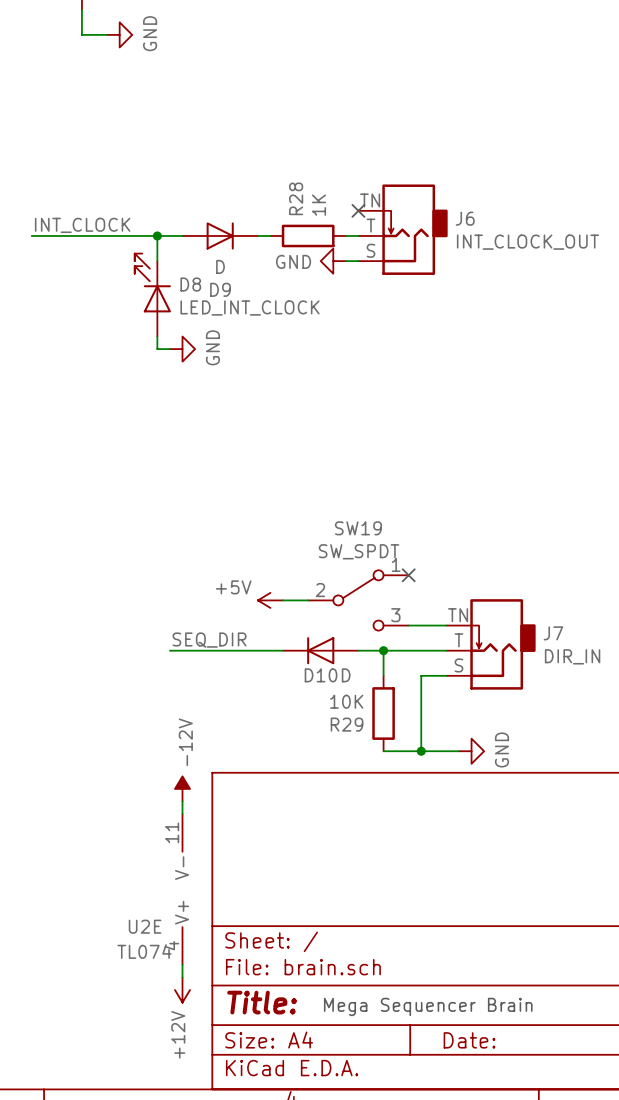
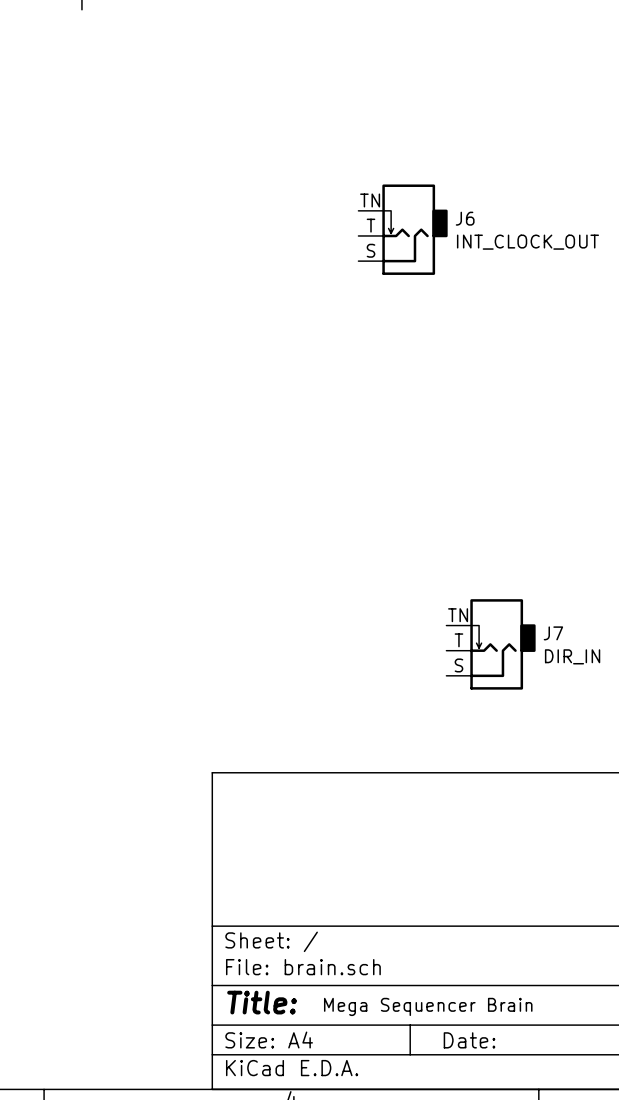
wire: (81, 9) (81, 34) (107, 34) -> none
power symbol: GND (119, 34) -> none
no-connect mark: (358, 210) -> none
label: INT_CLOCK (82, 225) -> none
wire: (31, 235) (182, 235) -> none
wire: (157, 235) (157, 261) -> none
junction: (157, 235) -> none
D9: D (220, 235) -> none
wire: (257, 235) (270, 235) -> none
R28: 1K (308, 235) -> none
wire: (345, 235) (358, 235) -> none
power symbol: GND (333, 261) -> none
wire: (345, 261) (358, 261) -> none
D8: LED_INT_CLOCK (152, 295) -> none
wire: (157, 336) (157, 349) (169, 349) -> none
power symbol: GND (182, 349) -> none
no-connect mark: (408, 575) -> none
power symbol: +5V (270, 600) -> none
wire: (283, 600) (308, 600) -> none
SW19: SW_SPDT (358, 600) -> none
wire: (408, 625) (446, 625) -> none
label: SEQ_DIR (209, 640) -> none
wire: (169, 650) (283, 650) -> none
D10: D (320, 650) -> none
wire: (358, 650) (446, 650) -> none
wire: (383, 650) (383, 675) -> none
junction: (383, 650) -> none
wire: (446, 675) (421, 675) (421, 751) -> none
R29: 10K (383, 713) -> none
wire: (383, 751) (458, 751) -> none
junction: (421, 751) -> none
power symbol: GND (471, 751) -> none
power symbol: -12V (182, 788) -> none
wire: (182, 801) (182, 814) -> none
U2E: TL074 (182, 889) -> none
wire: (182, 964) (182, 977) -> none
power symbol: +12V (182, 989) -> none

